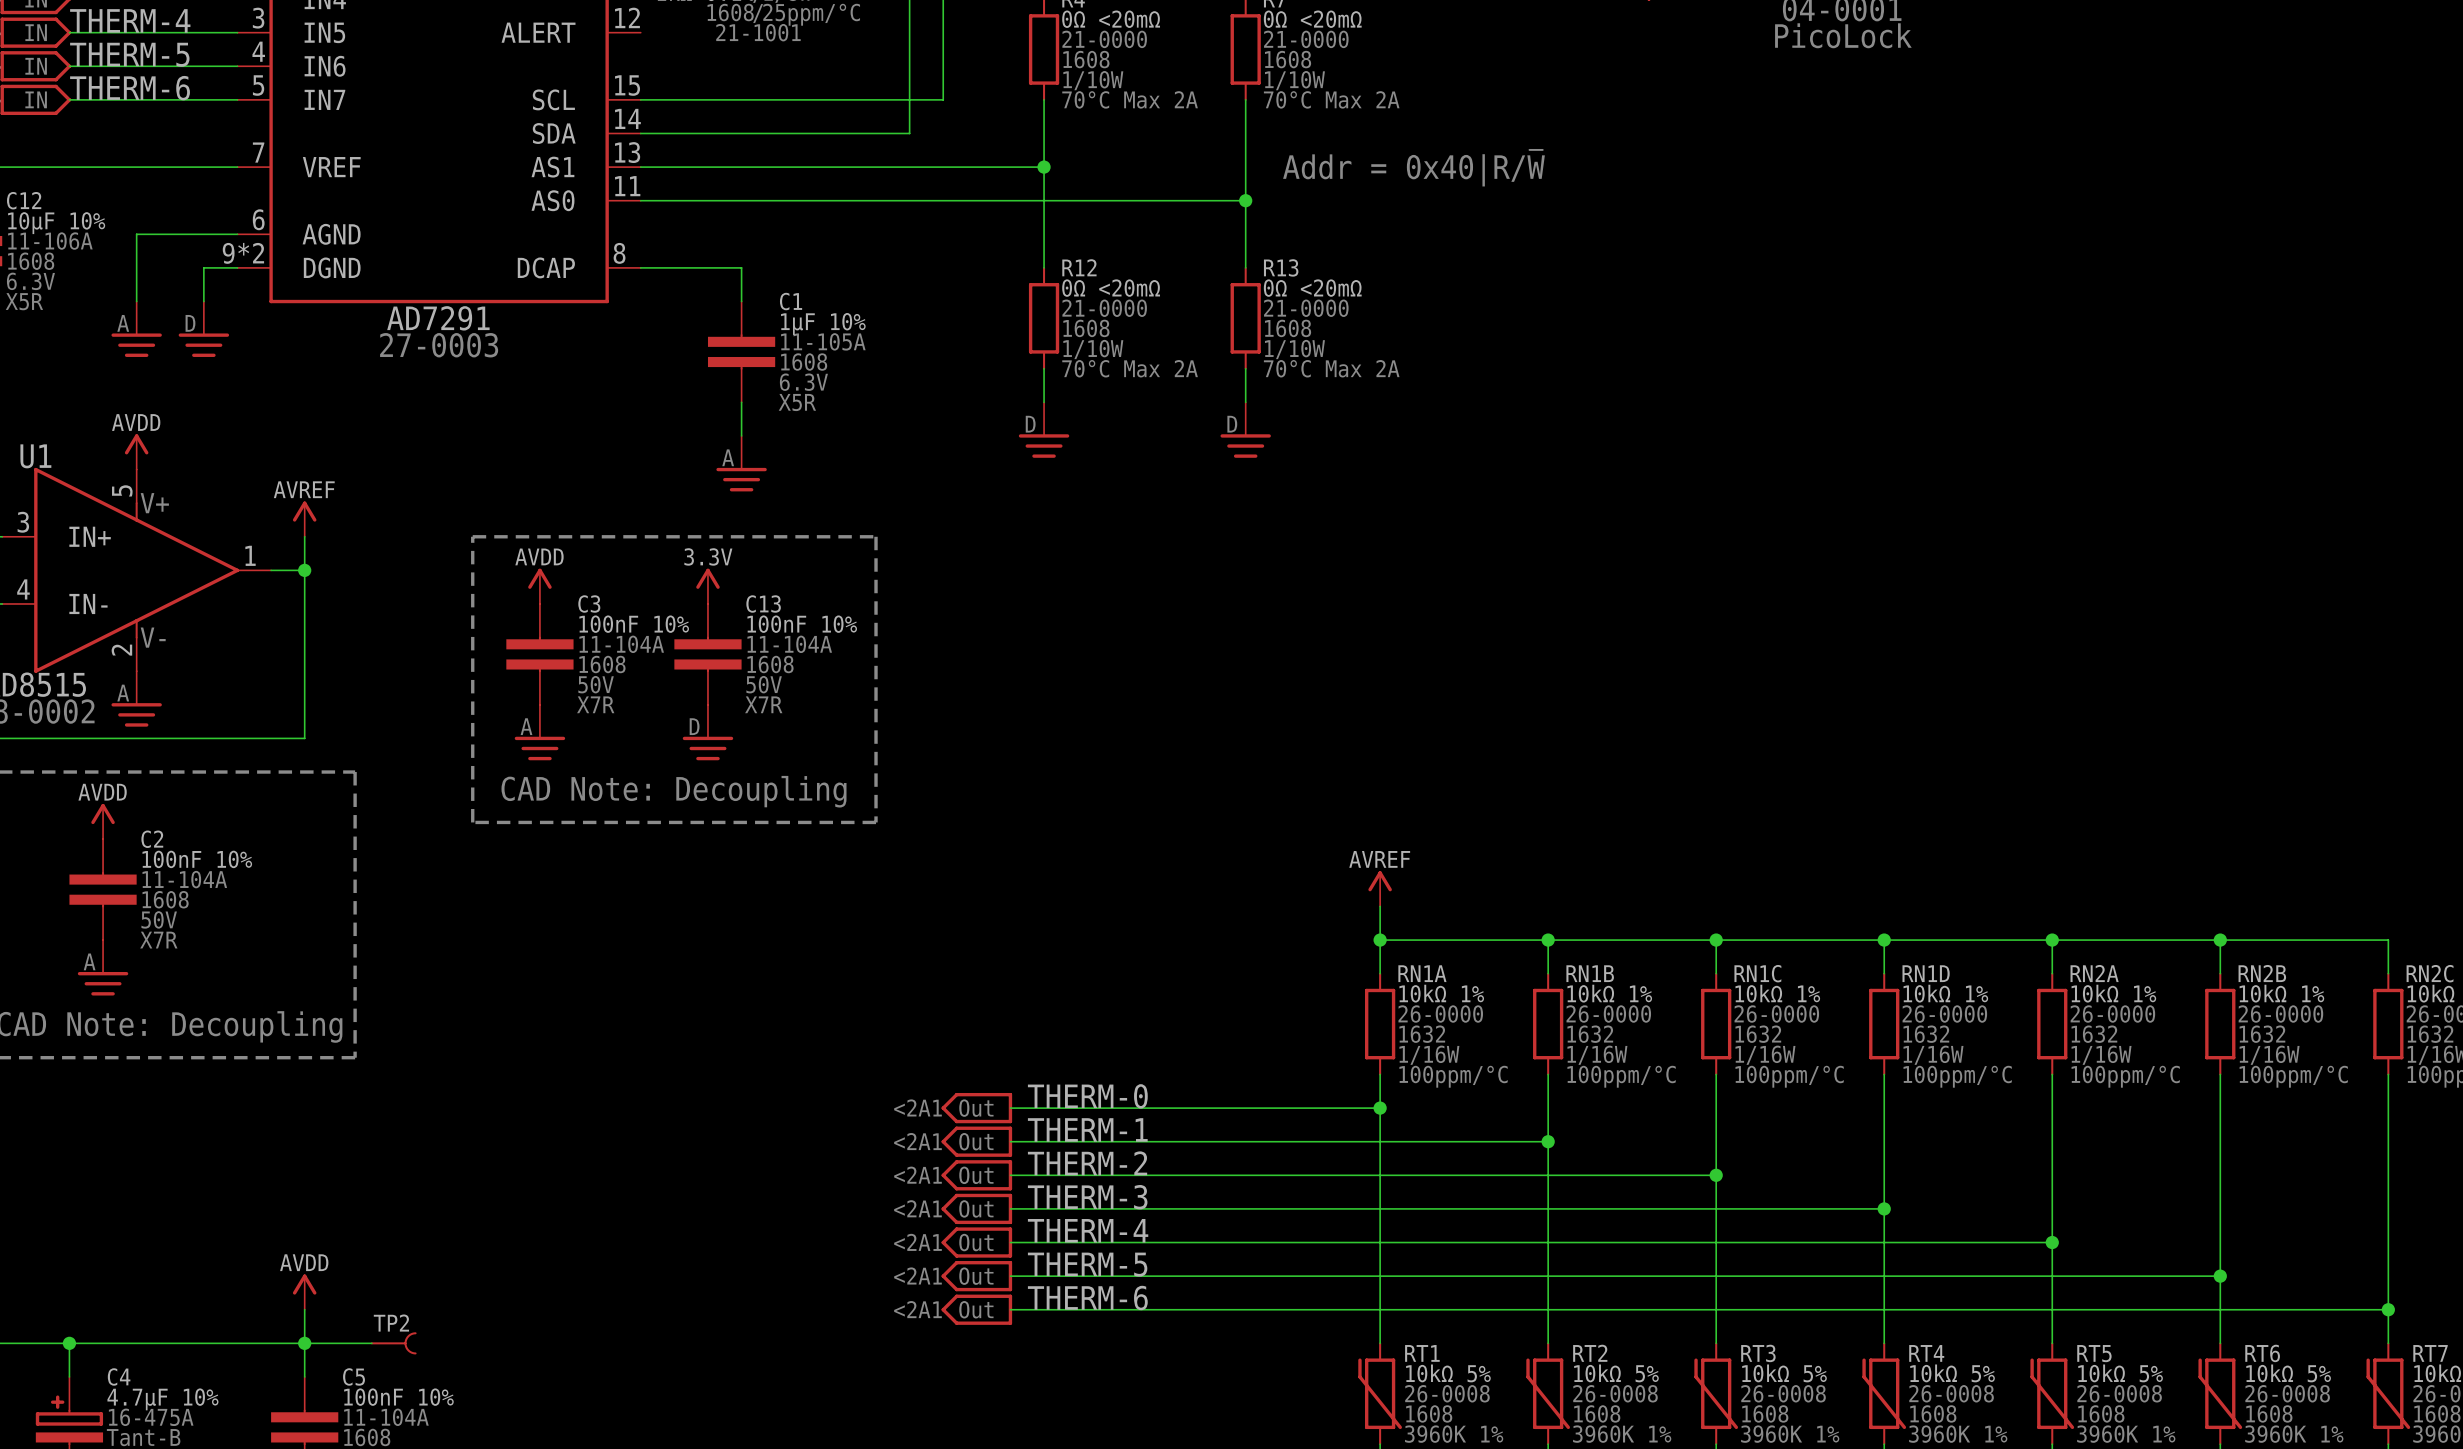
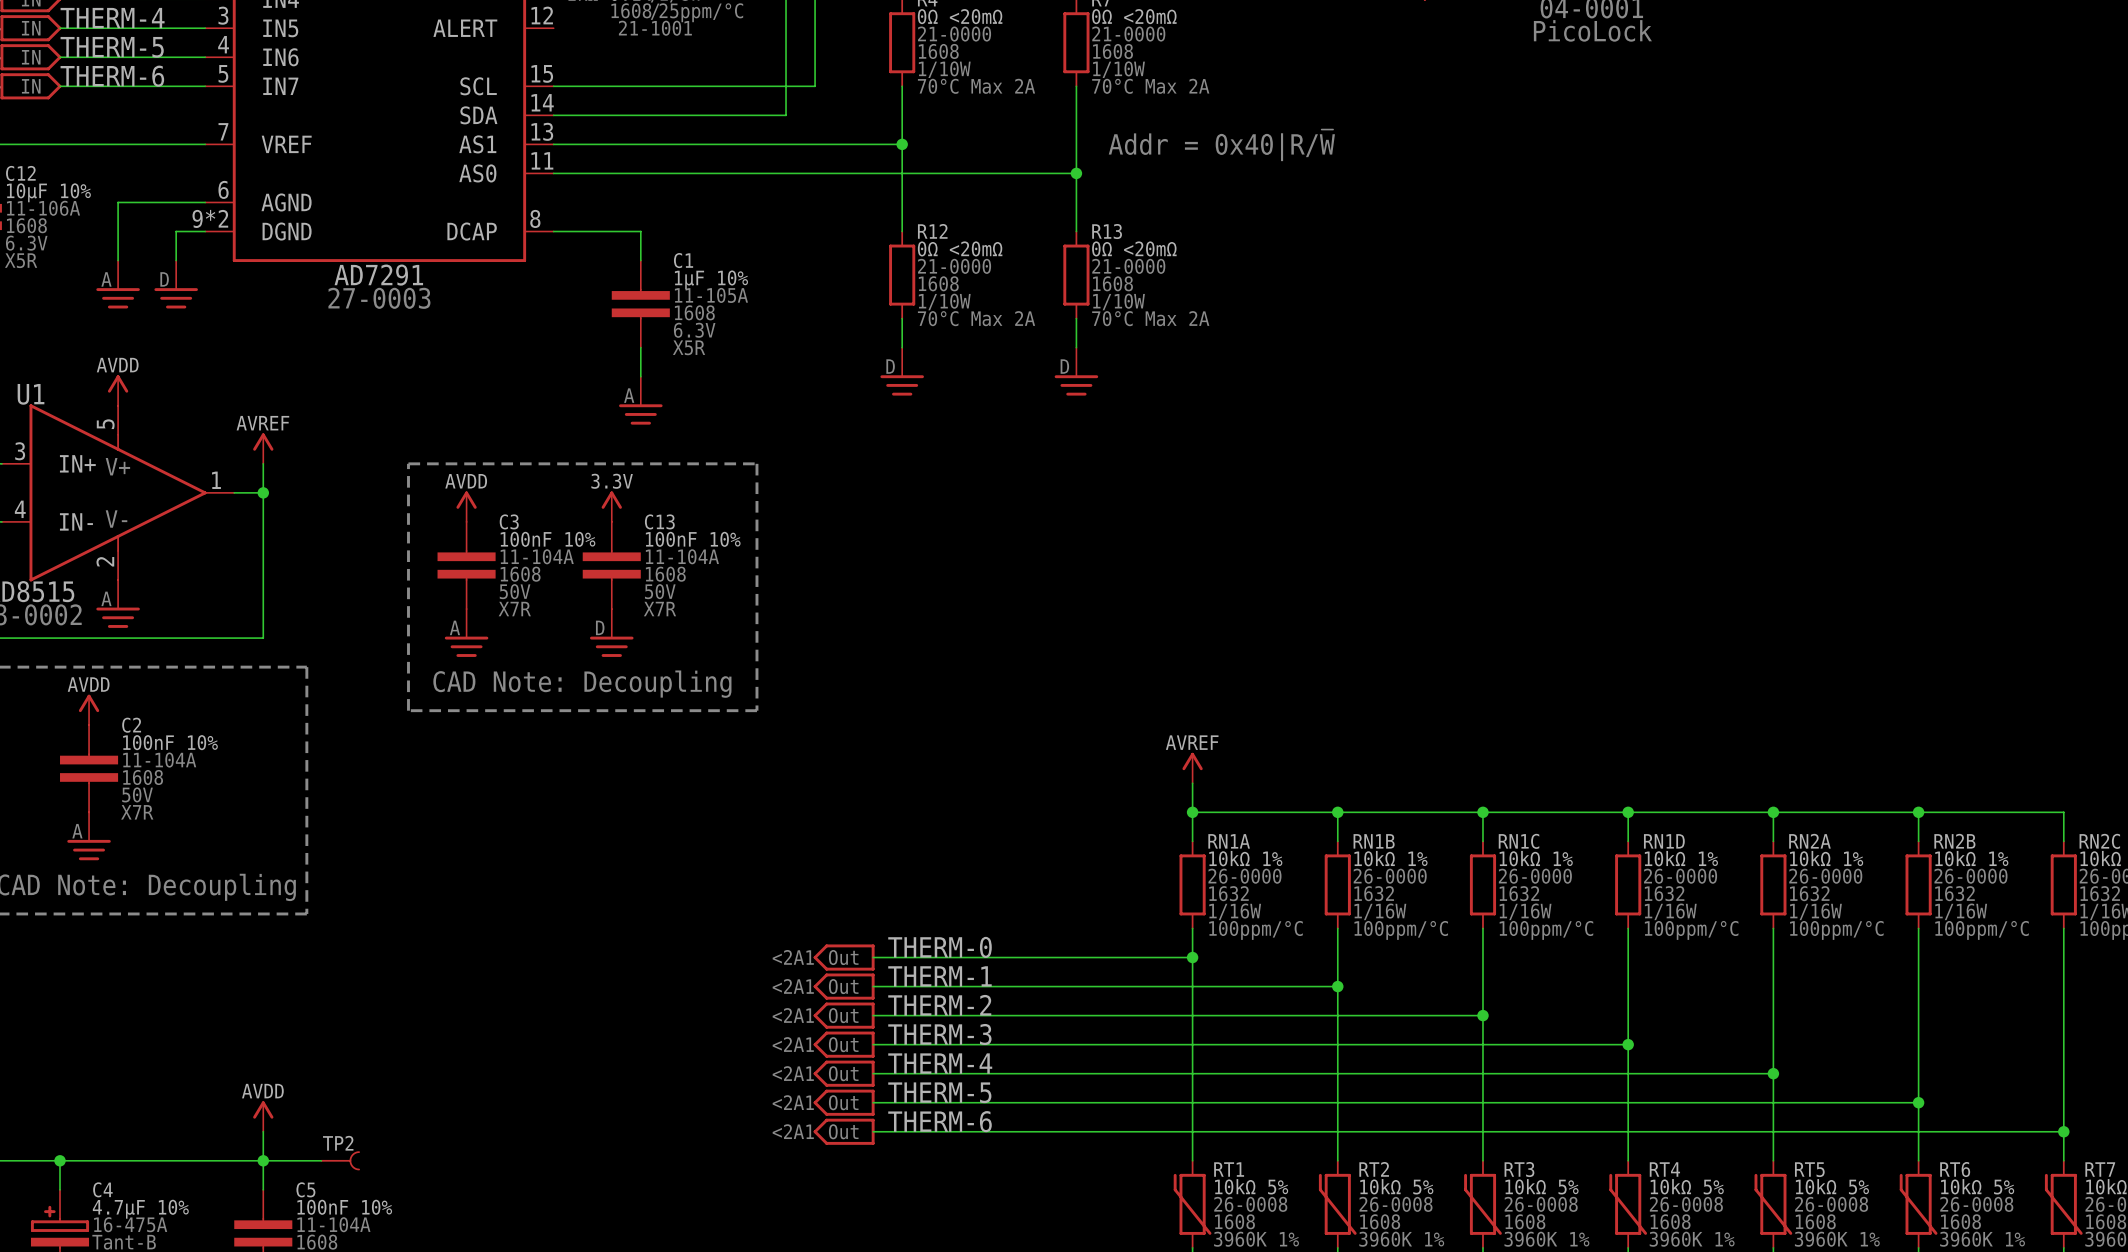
U1 text position: V+ (154, 503) -> V+ (117, 466)
U1 text position: V- (153, 637) -> V- (116, 519)

